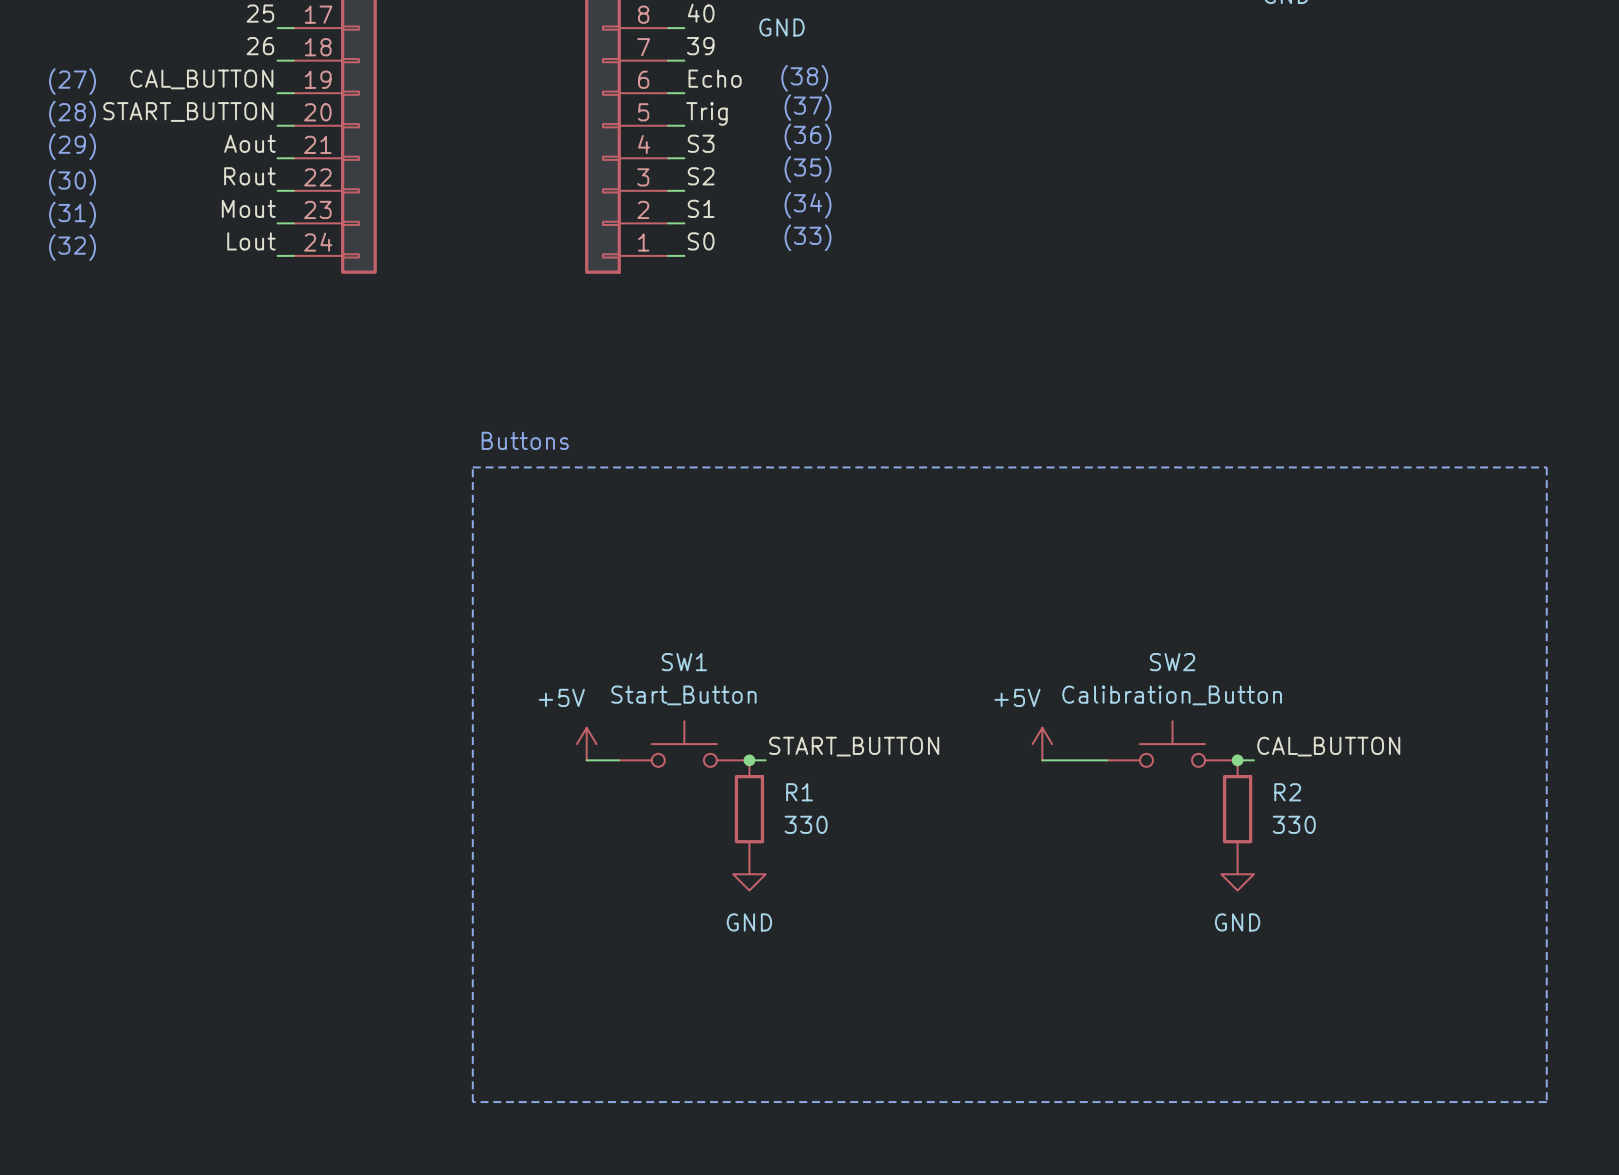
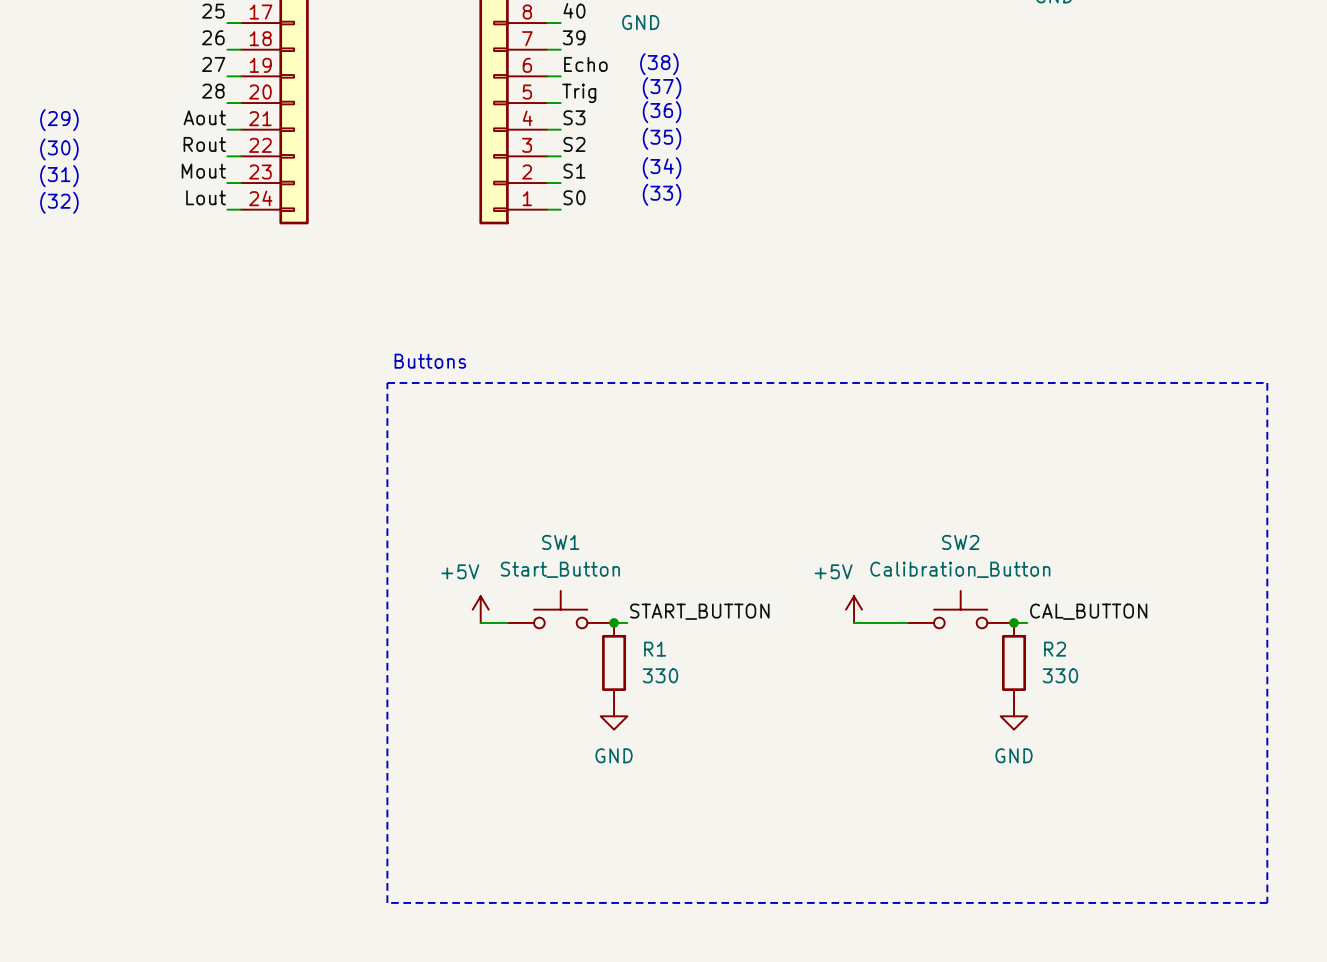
label: CAL_BUTTON (201, 79) -> 27 (213, 64)
text: (27) (72, 81) -> none
label: START_BUTTON (188, 111) -> 28 (213, 91)
text: (28) (72, 114) -> none

